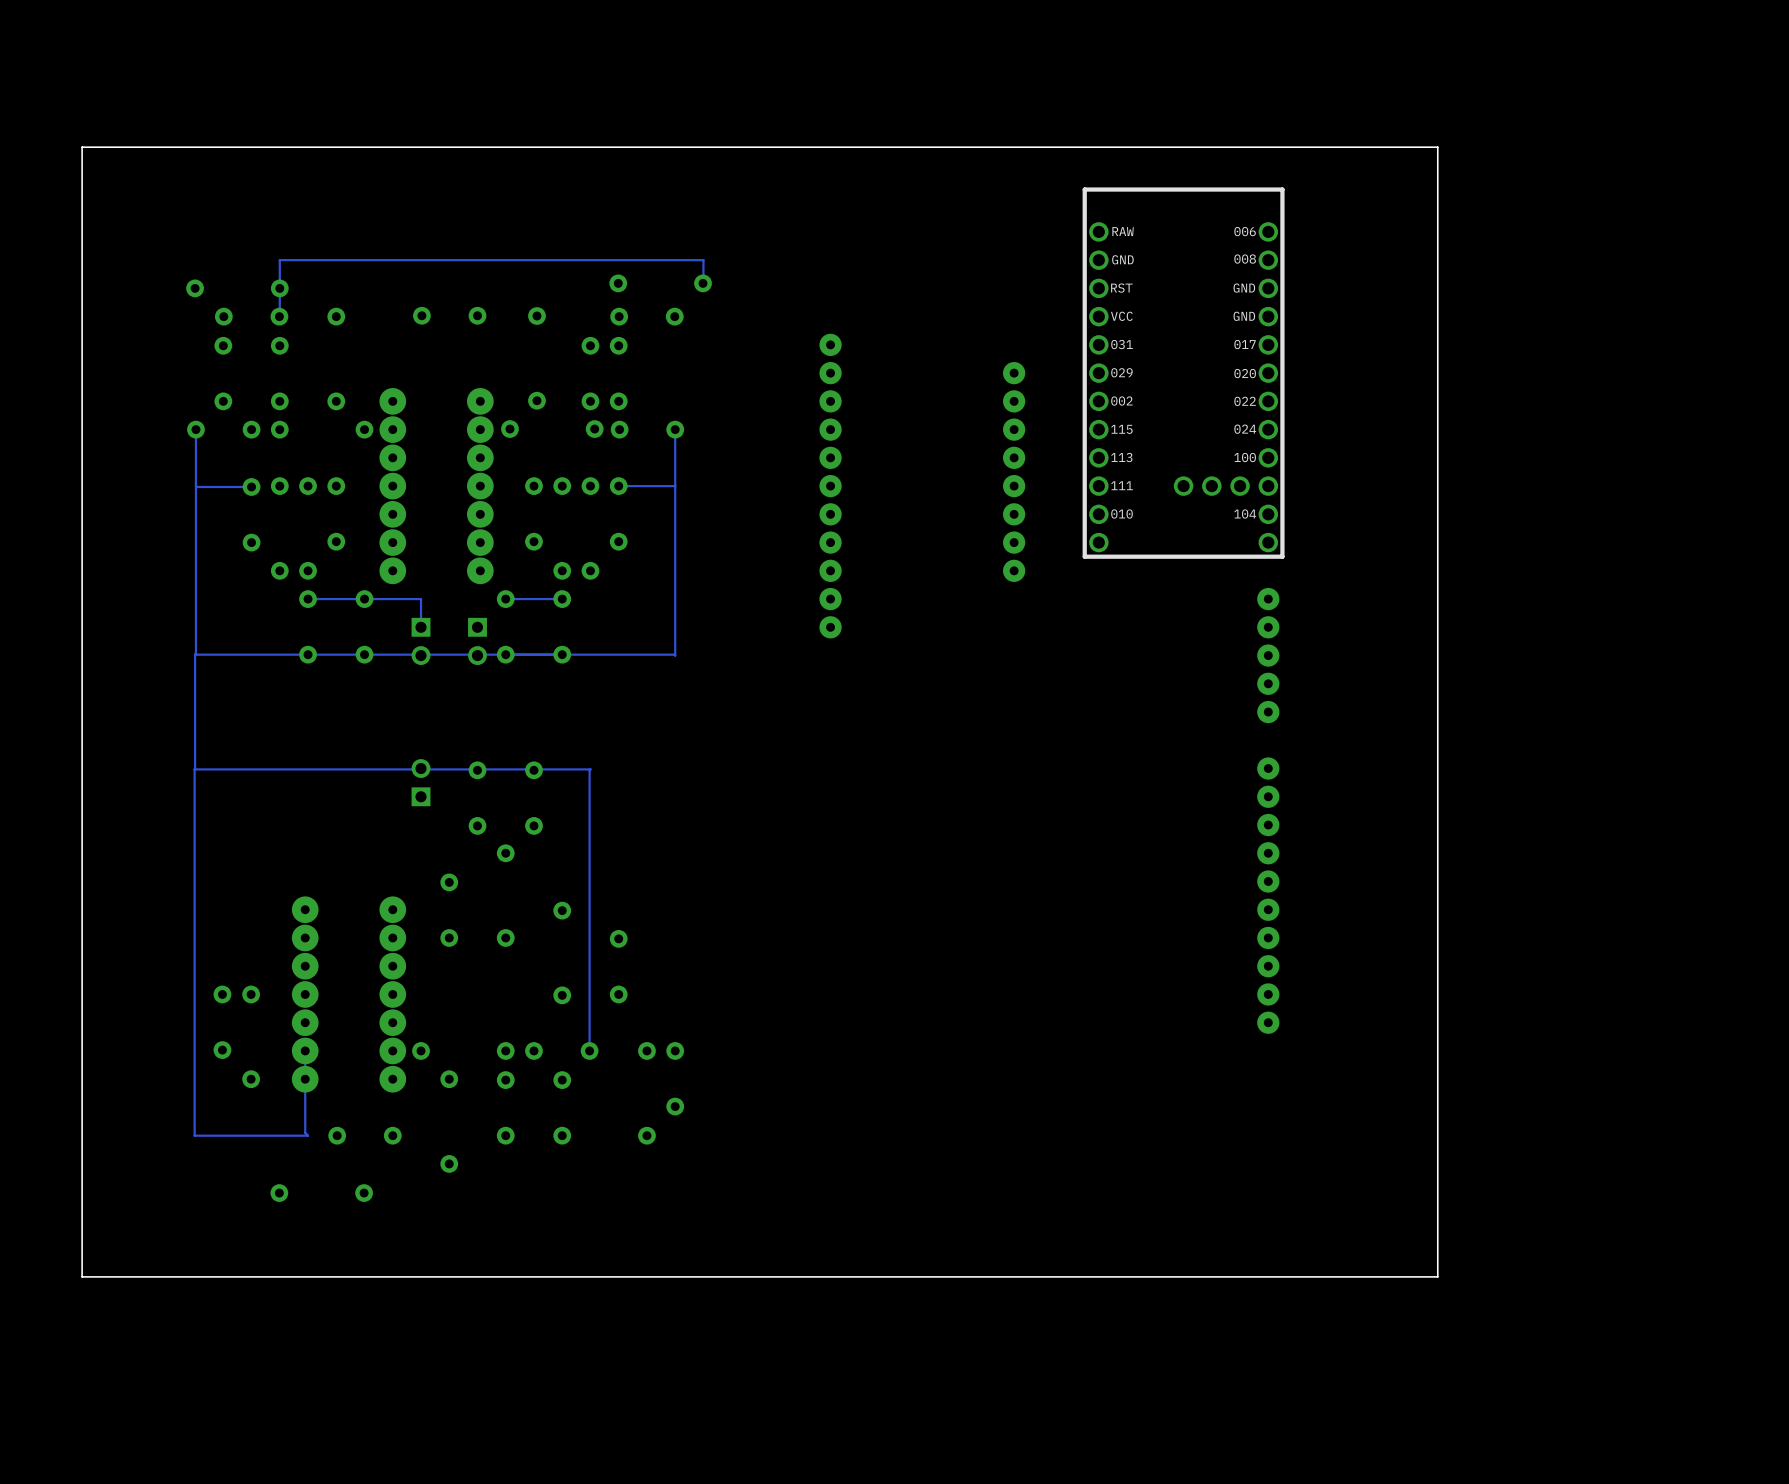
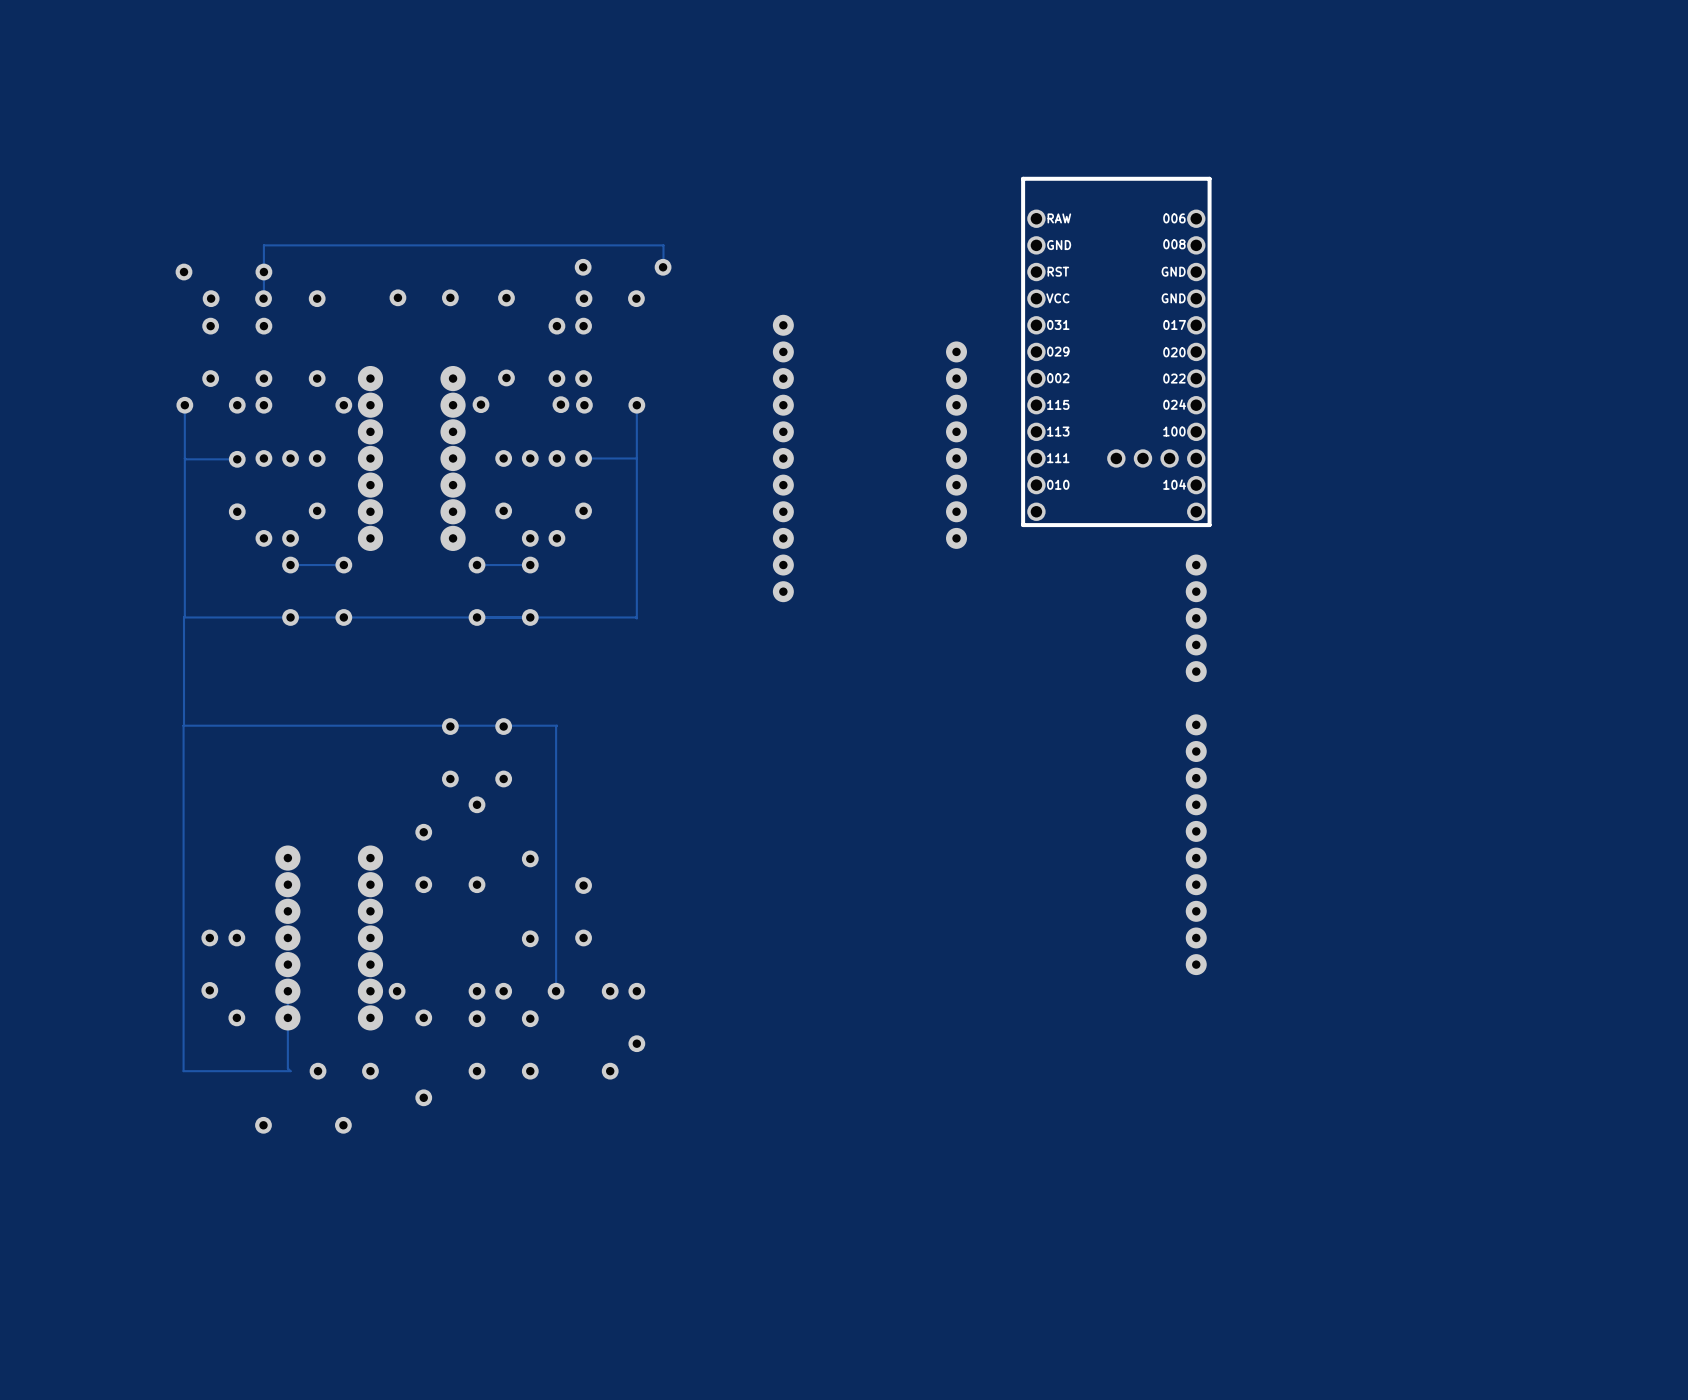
board edge: (1437, 147) (82, 147) (82, 1276) (1437, 1276) (1437, 147) -> none
track: (364, 599) (421, 599) (421, 627) -> none
part: (421, 641) -> none
part: (477, 641) -> none
part: (421, 782) -> none

